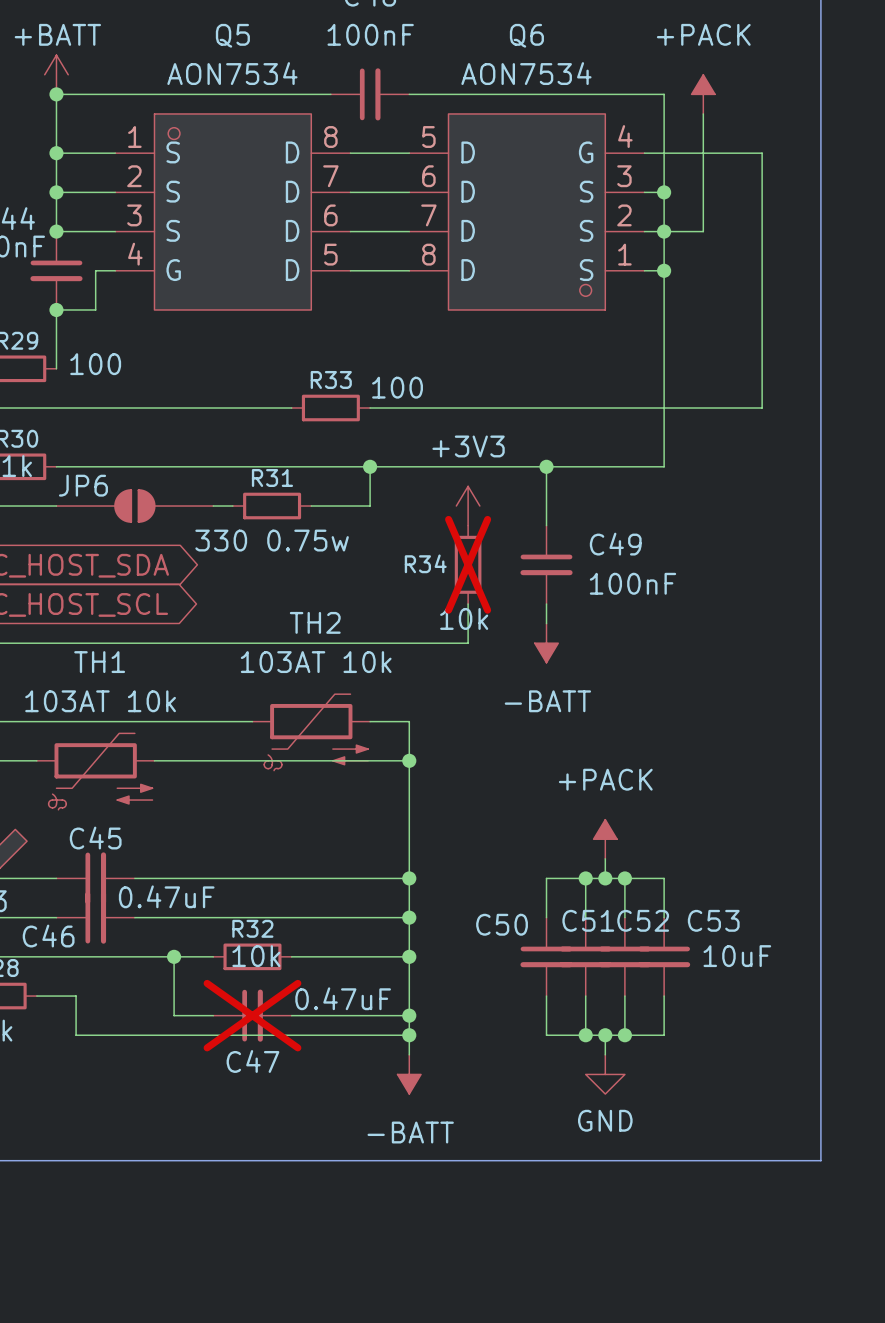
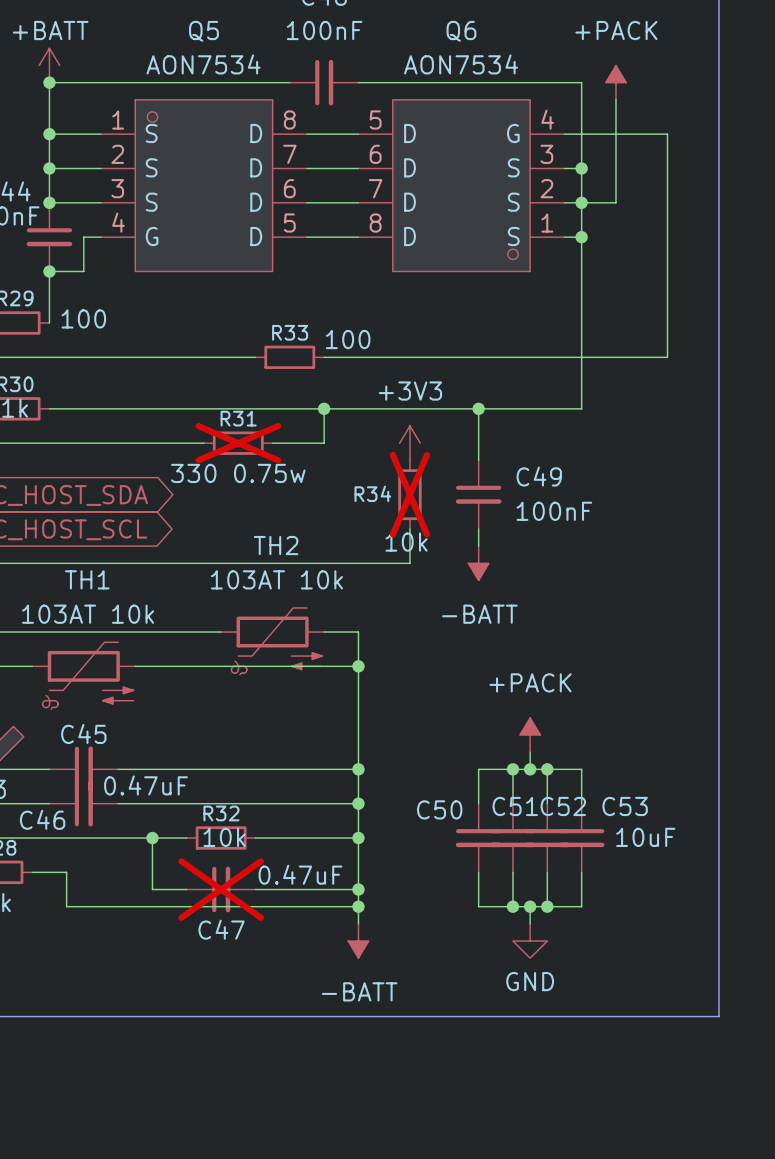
JP6: (134, 506) -> none
R31 do-not-place cross: none -> (238, 443)

